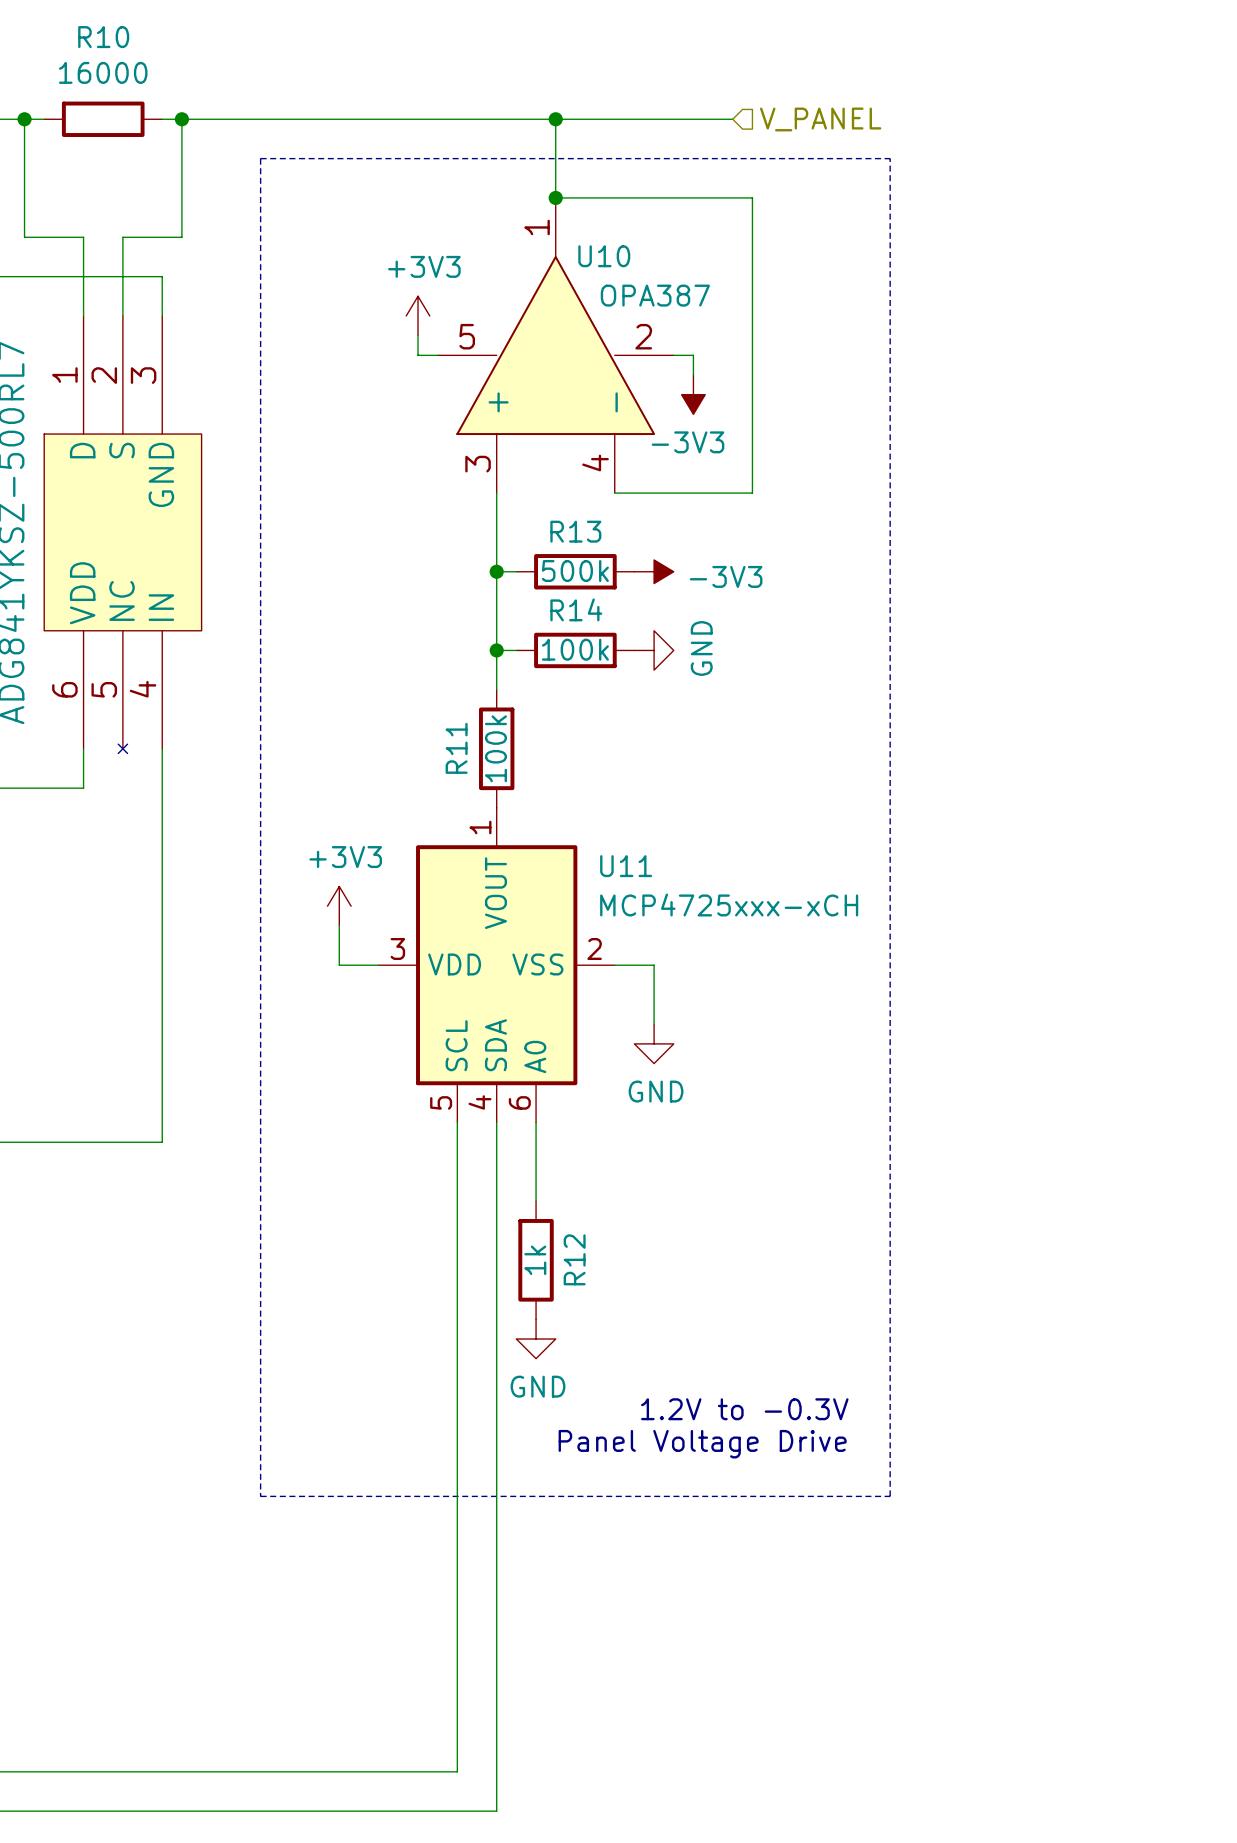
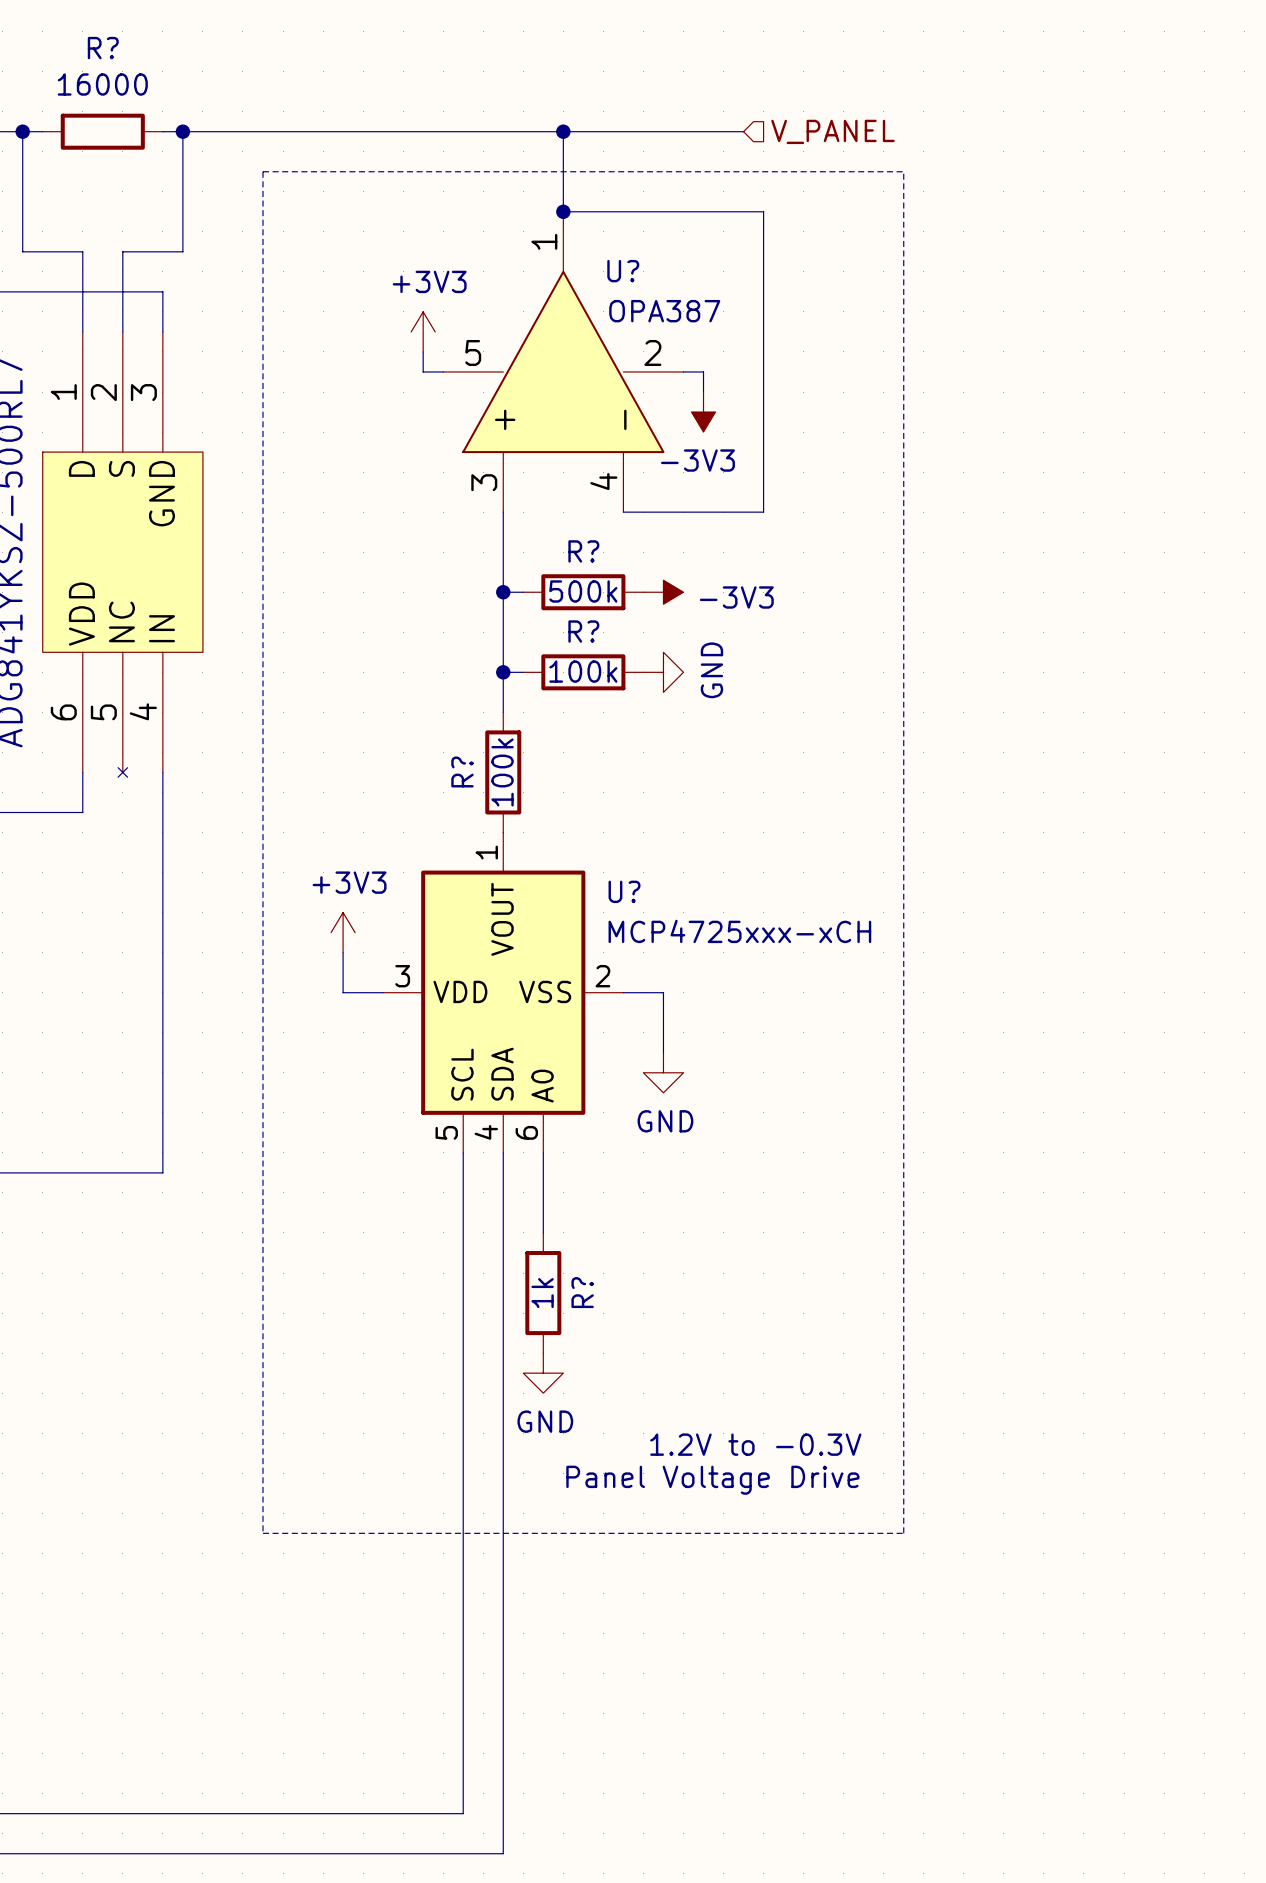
R10 name: R10 (103, 37) -> R? (103, 48)
U10 name: U10 (604, 256) -> U? (623, 271)
R13 name: R13 (575, 531) -> R? (583, 551)
R14 name: R14 (576, 609) -> R? (583, 631)
R11 name: R11 (456, 748) -> R? (462, 771)
U11 name: U11 (626, 866) -> U? (624, 891)
R12 name: R12 (574, 1259) -> R? (582, 1292)

